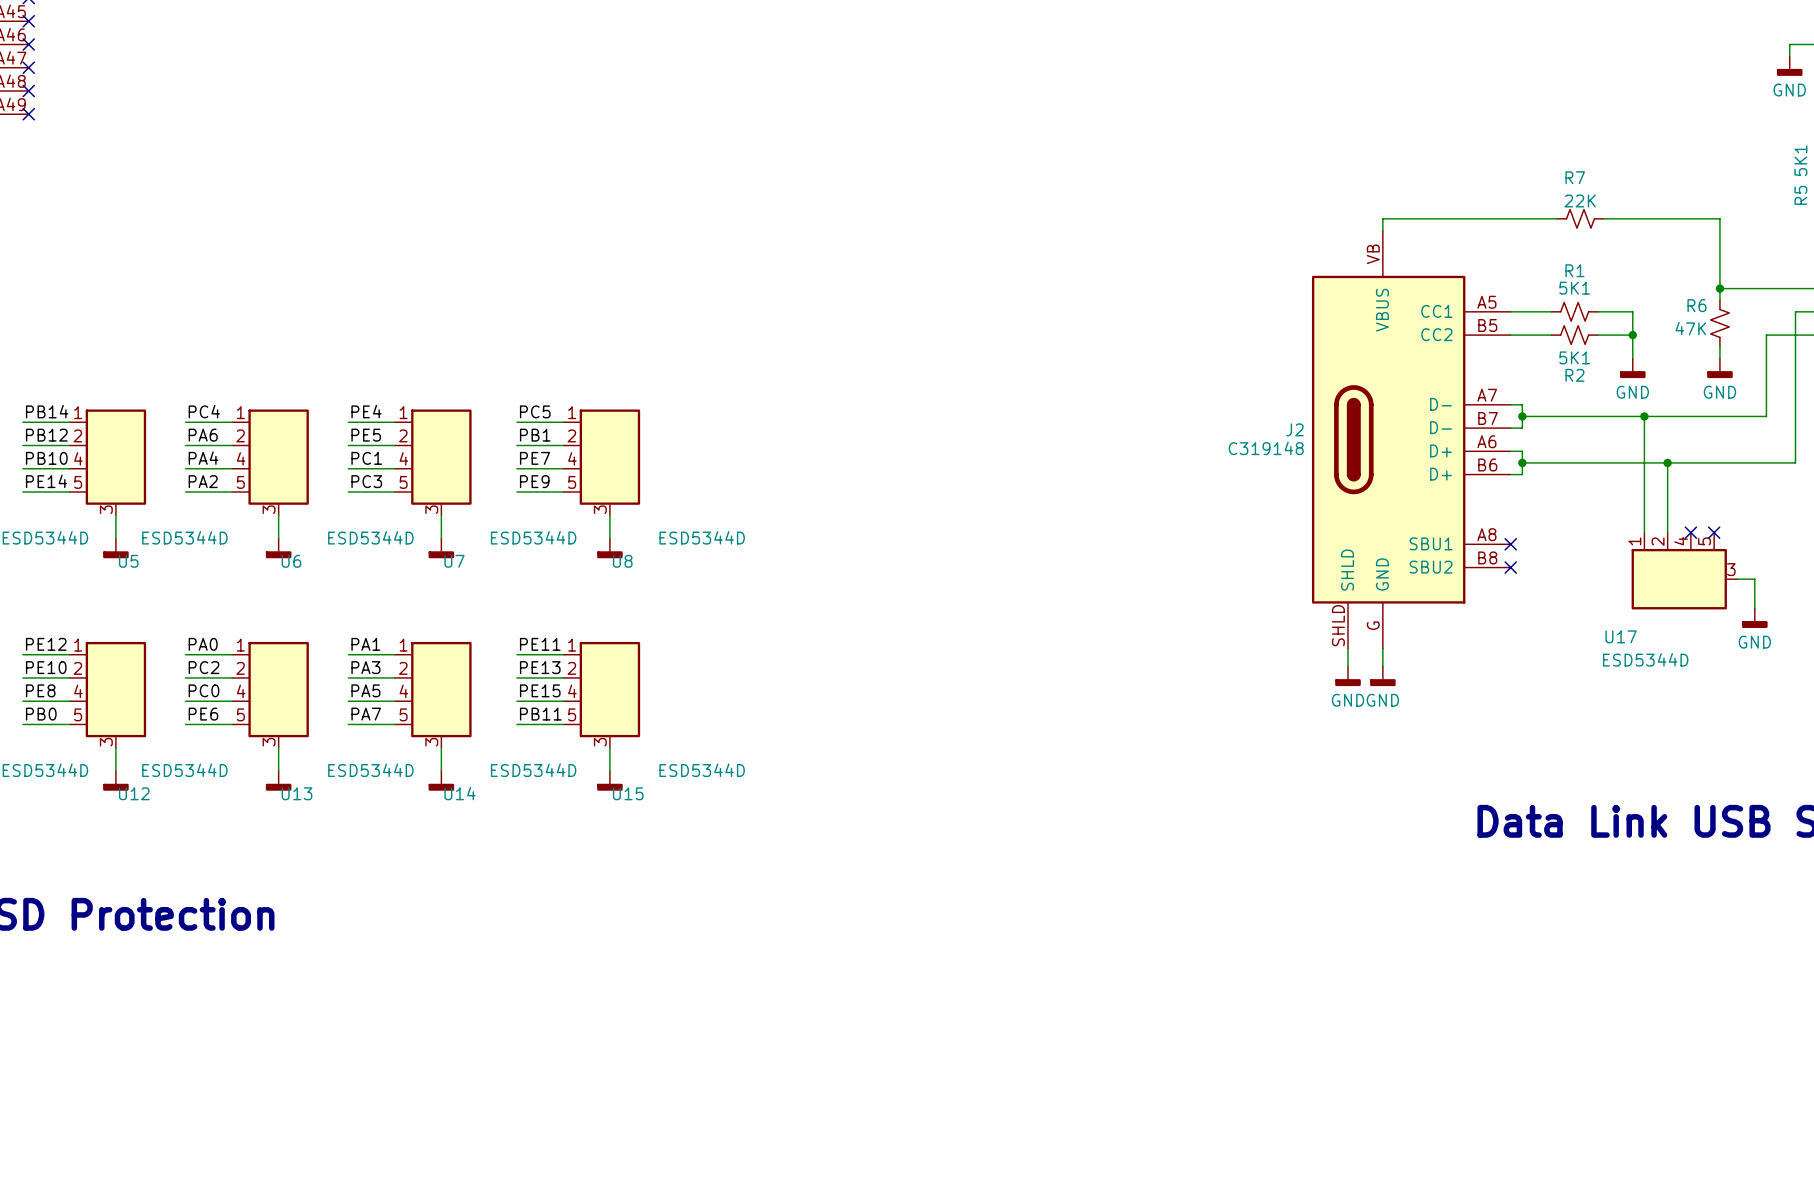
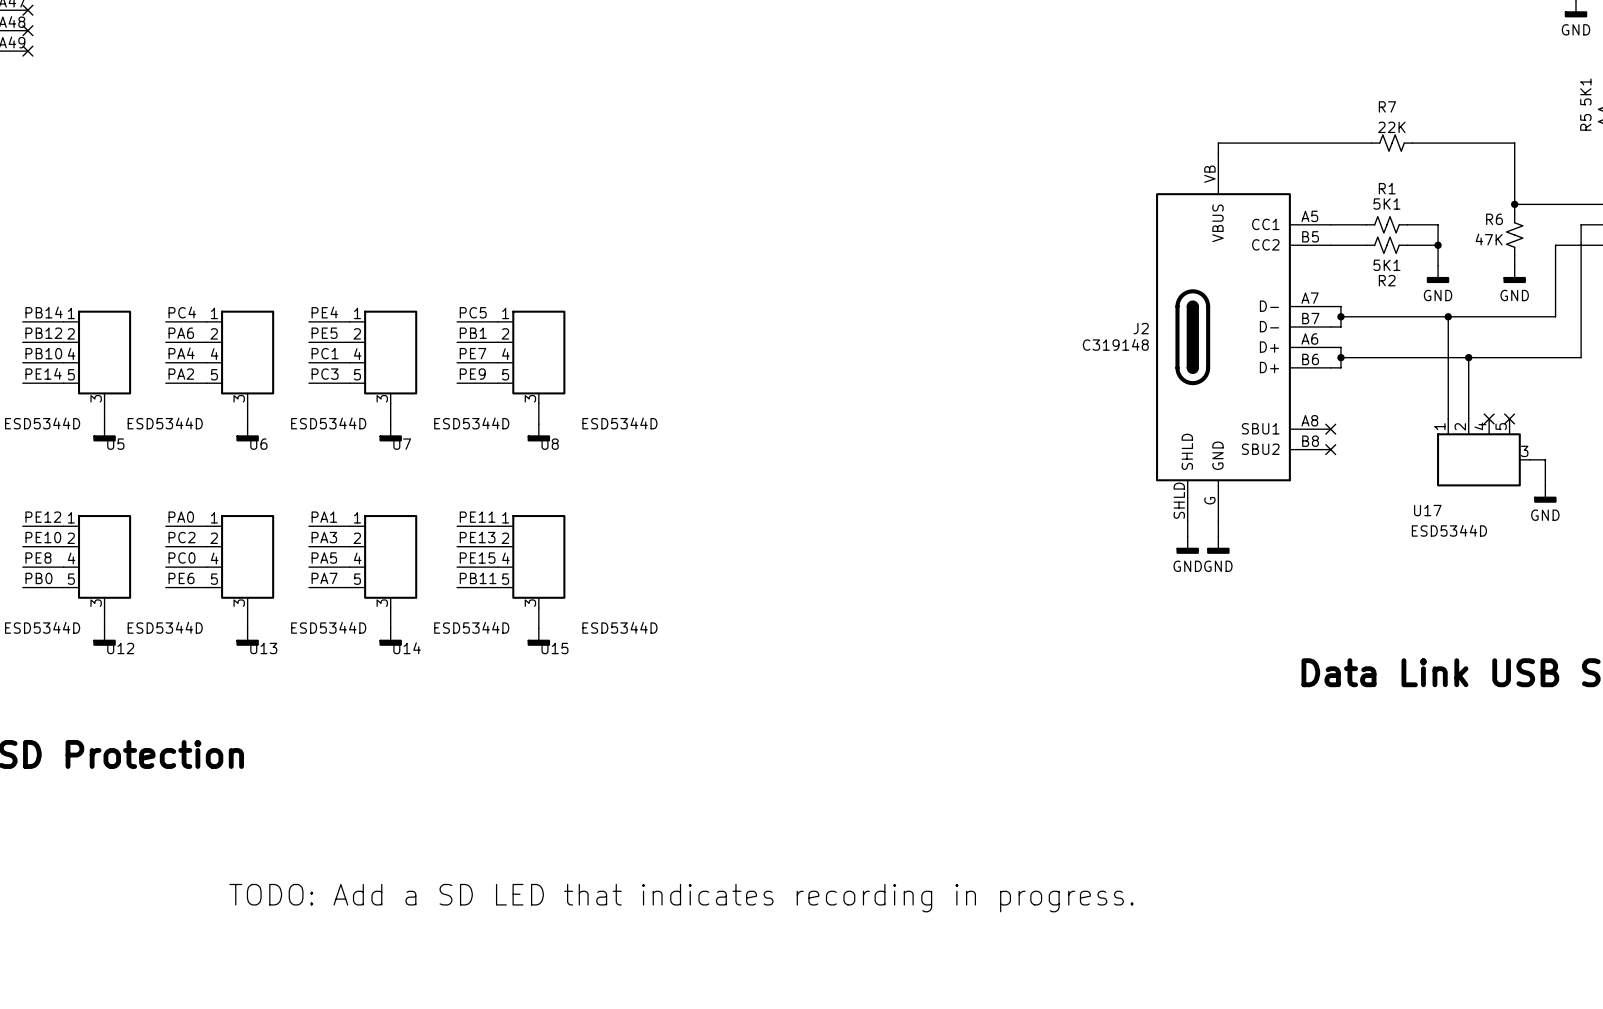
text: none -> TODO: Add a SD LED that indicates recording in progress. (681, 898)

